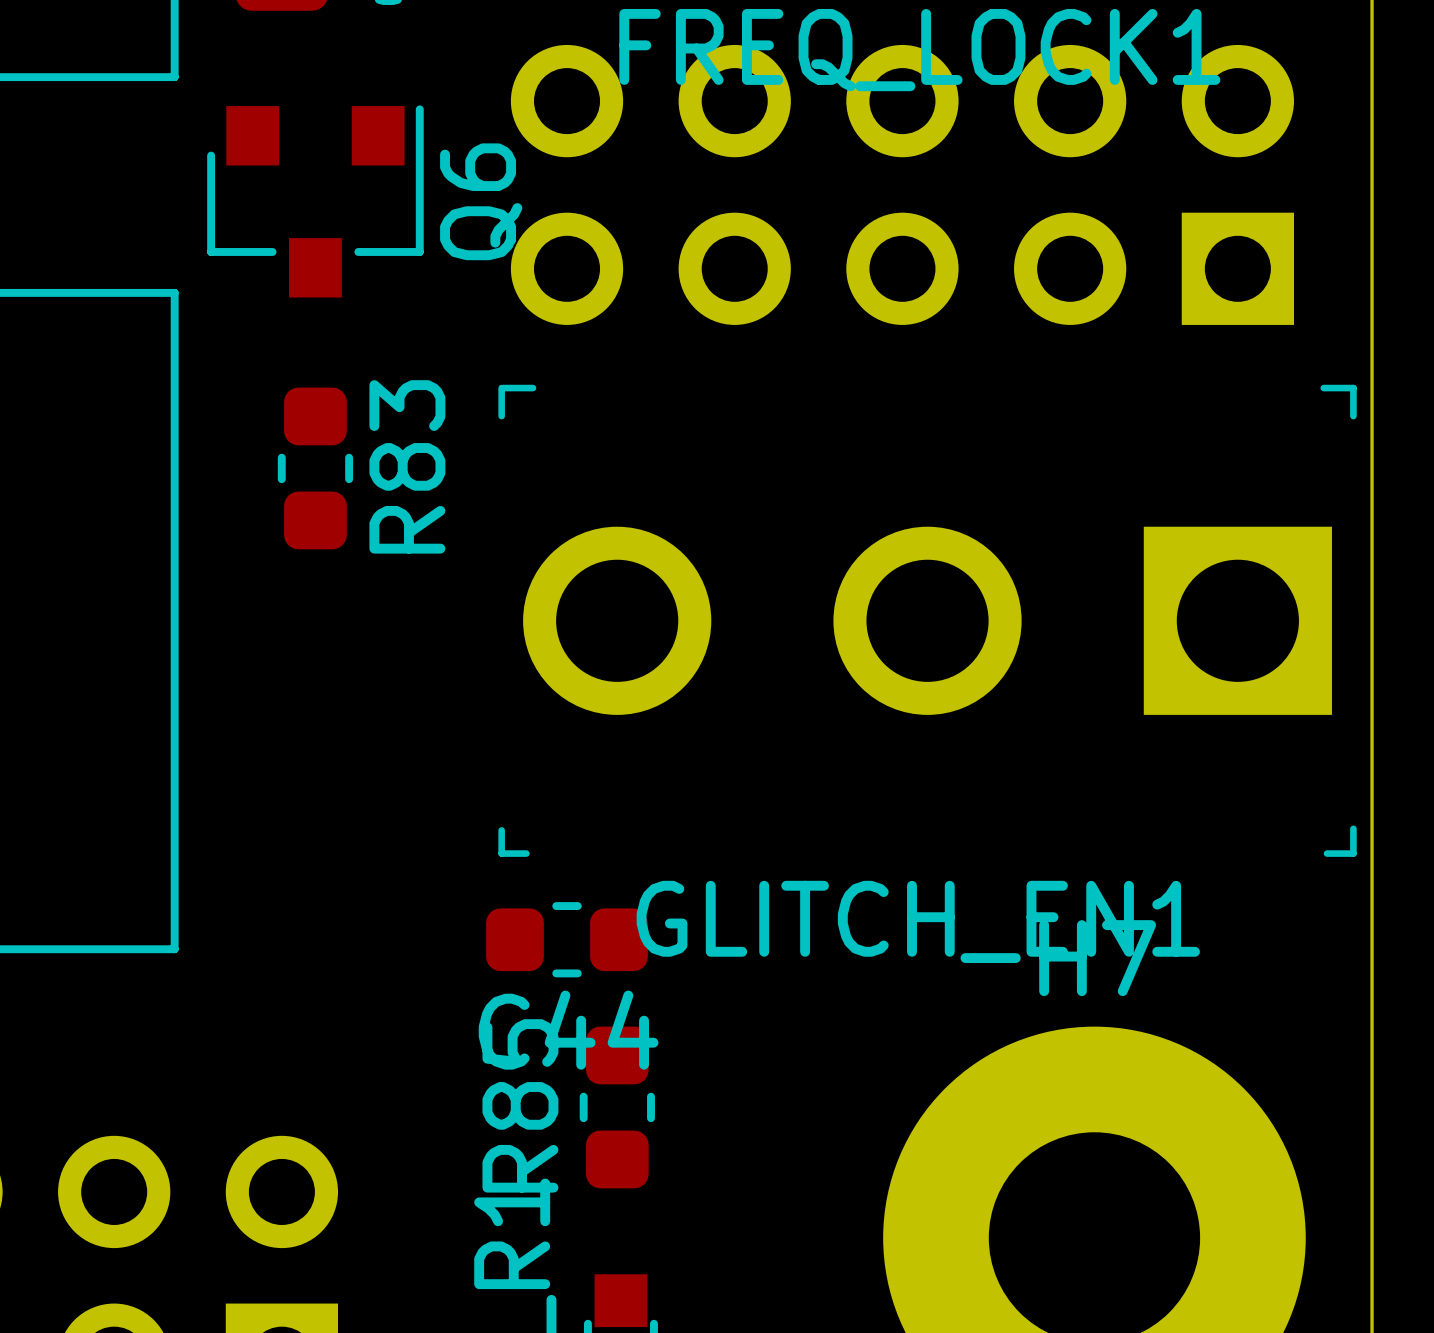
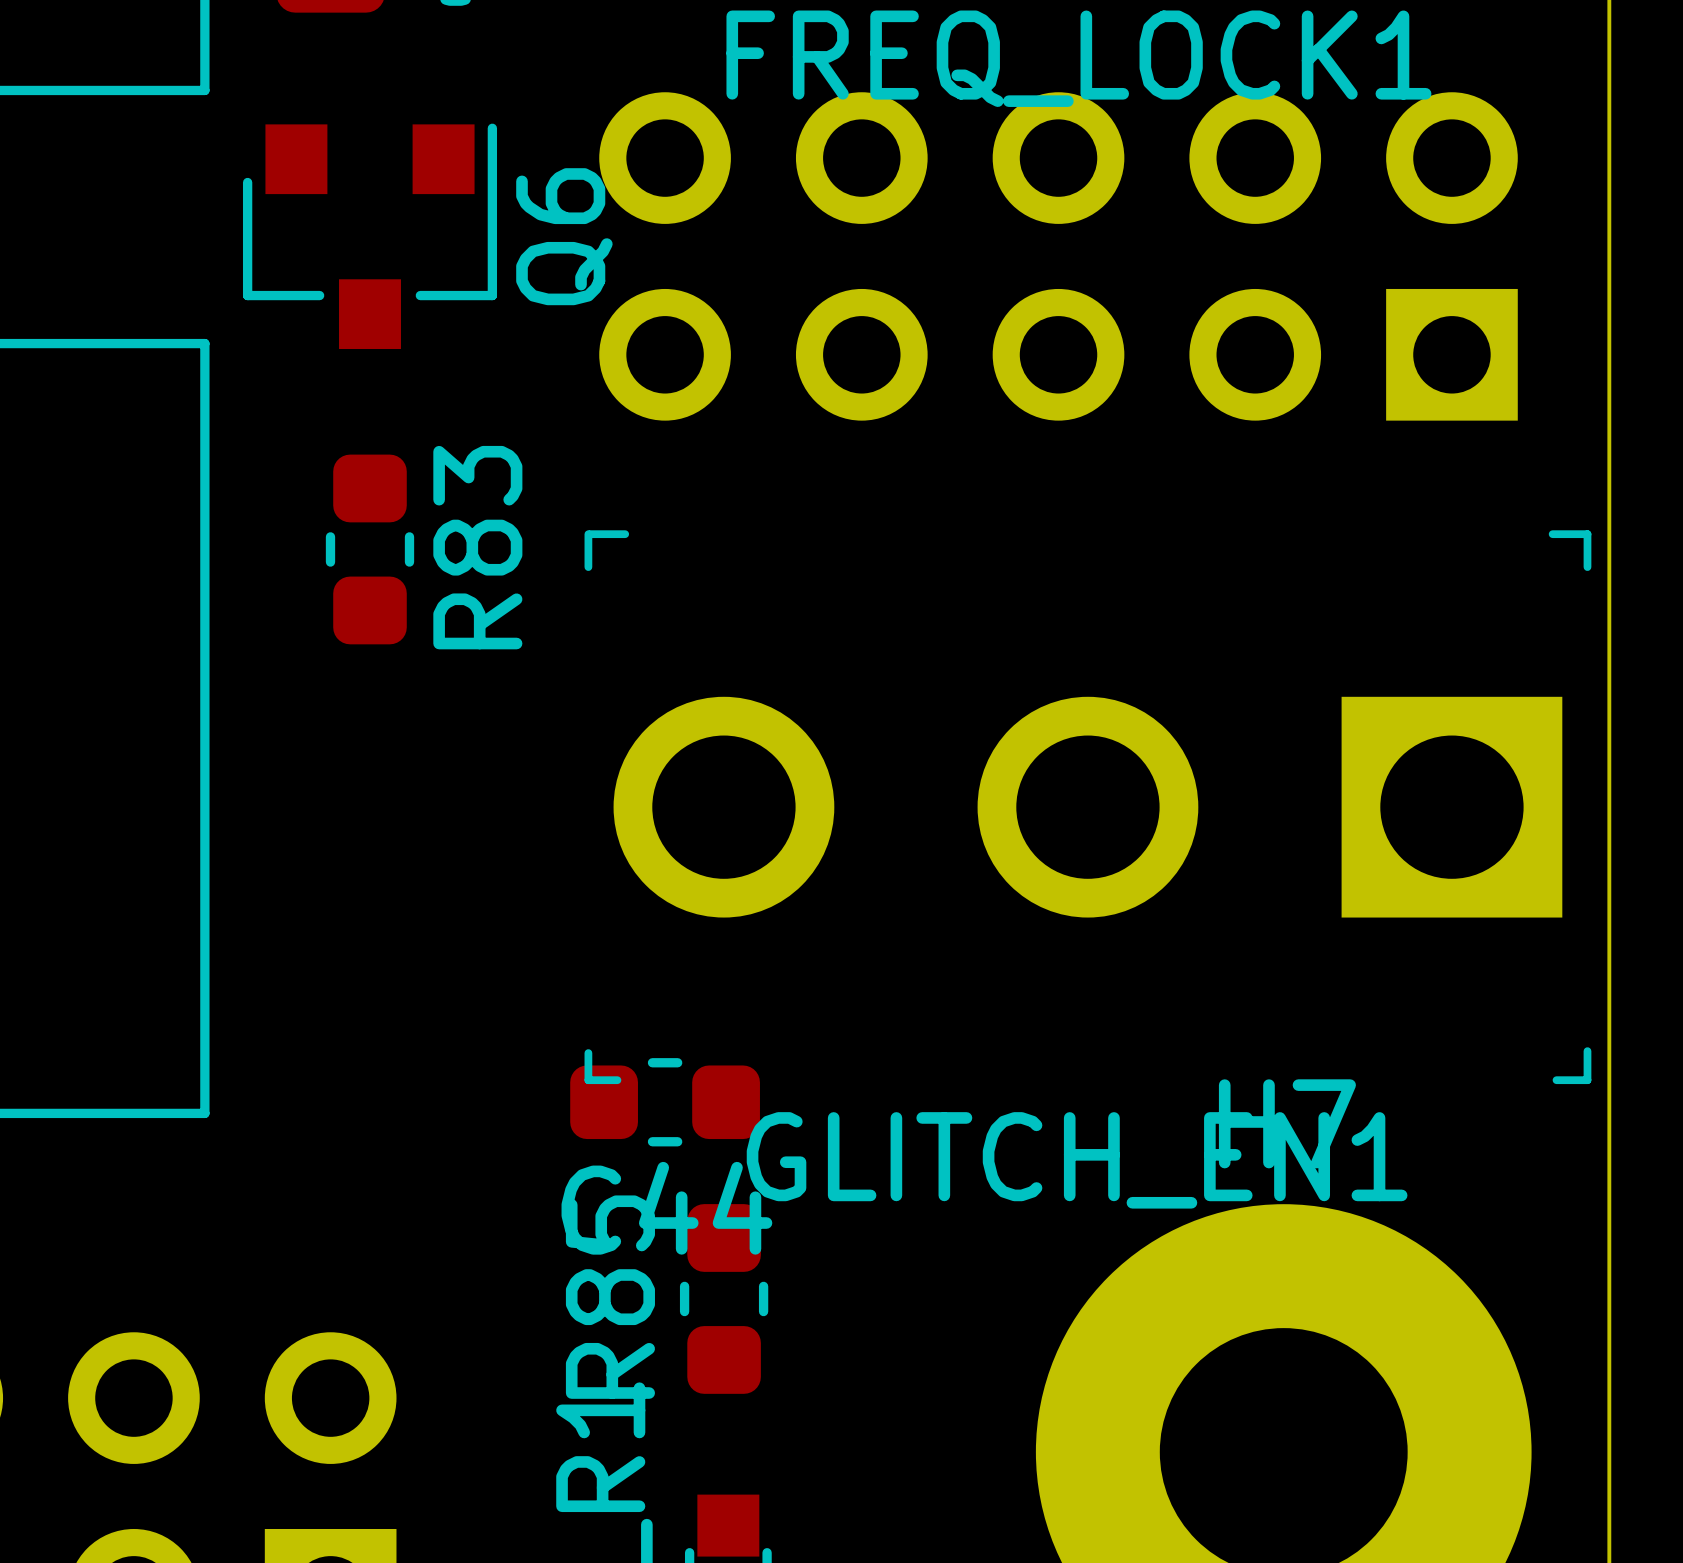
part position: (902, 184) -> (1058, 256)
GLITCH_EN1 position: (927, 620) -> (1087, 807)

